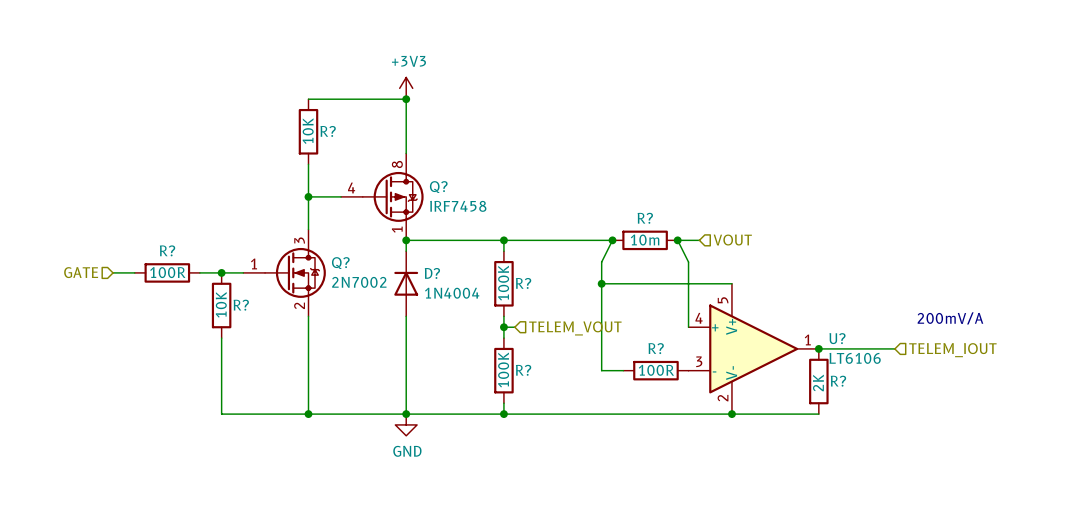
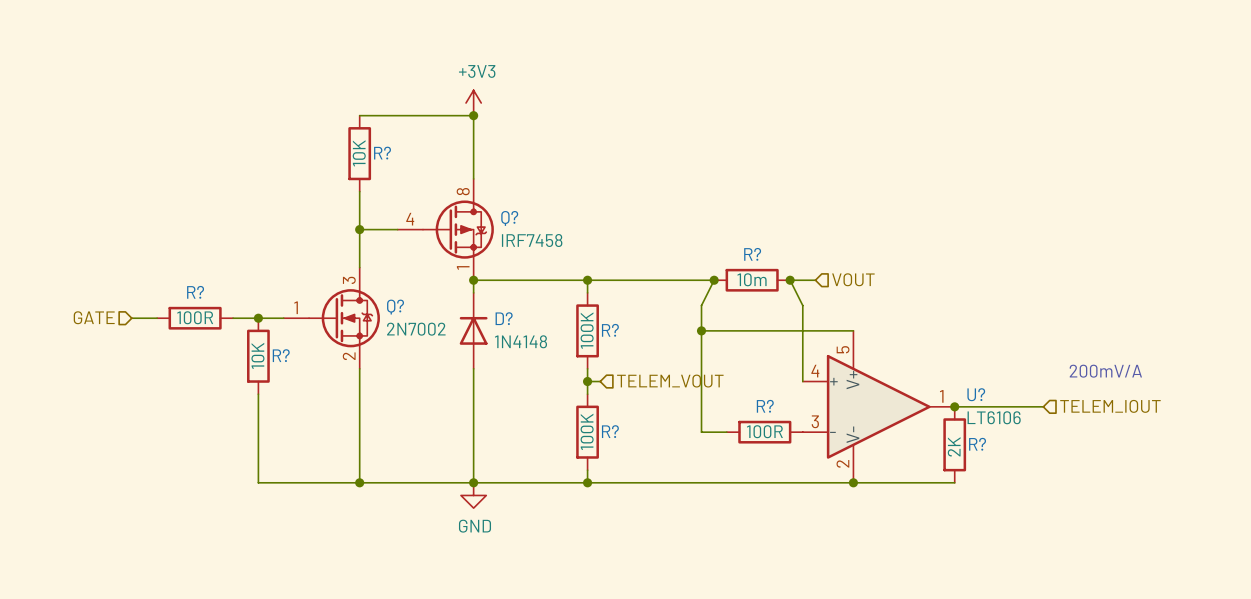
D? value: 1N4004 (452, 293) -> 1N4148 (520, 341)

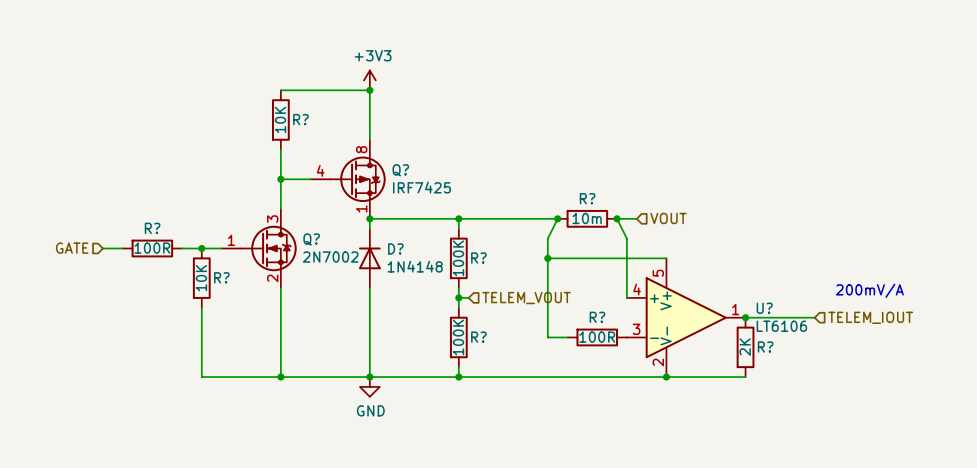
Q? value: IRF7458 (532, 240) -> IRF7425 (422, 187)

